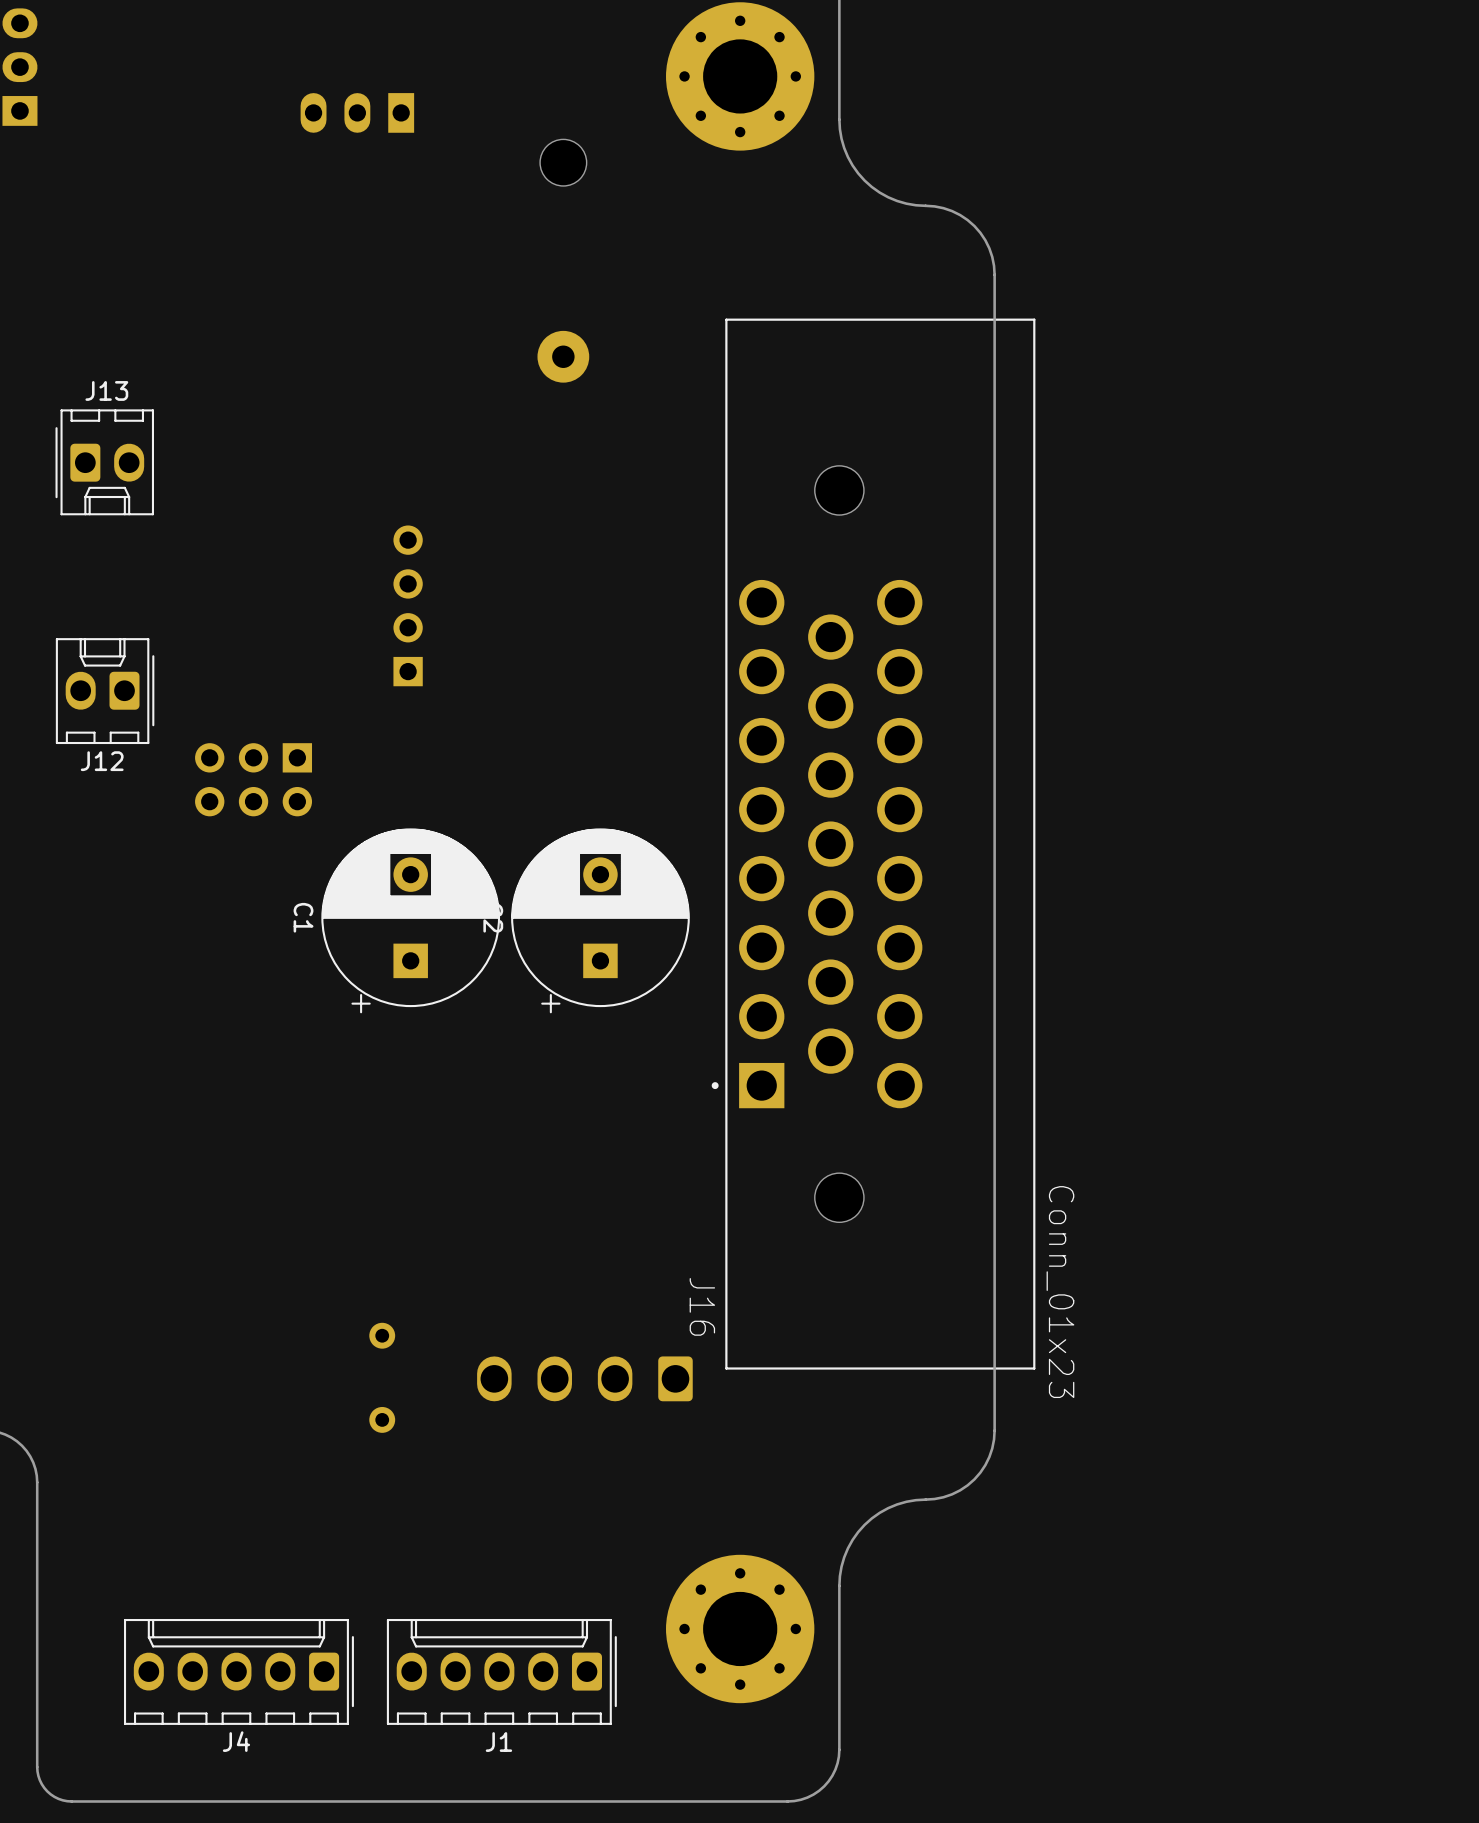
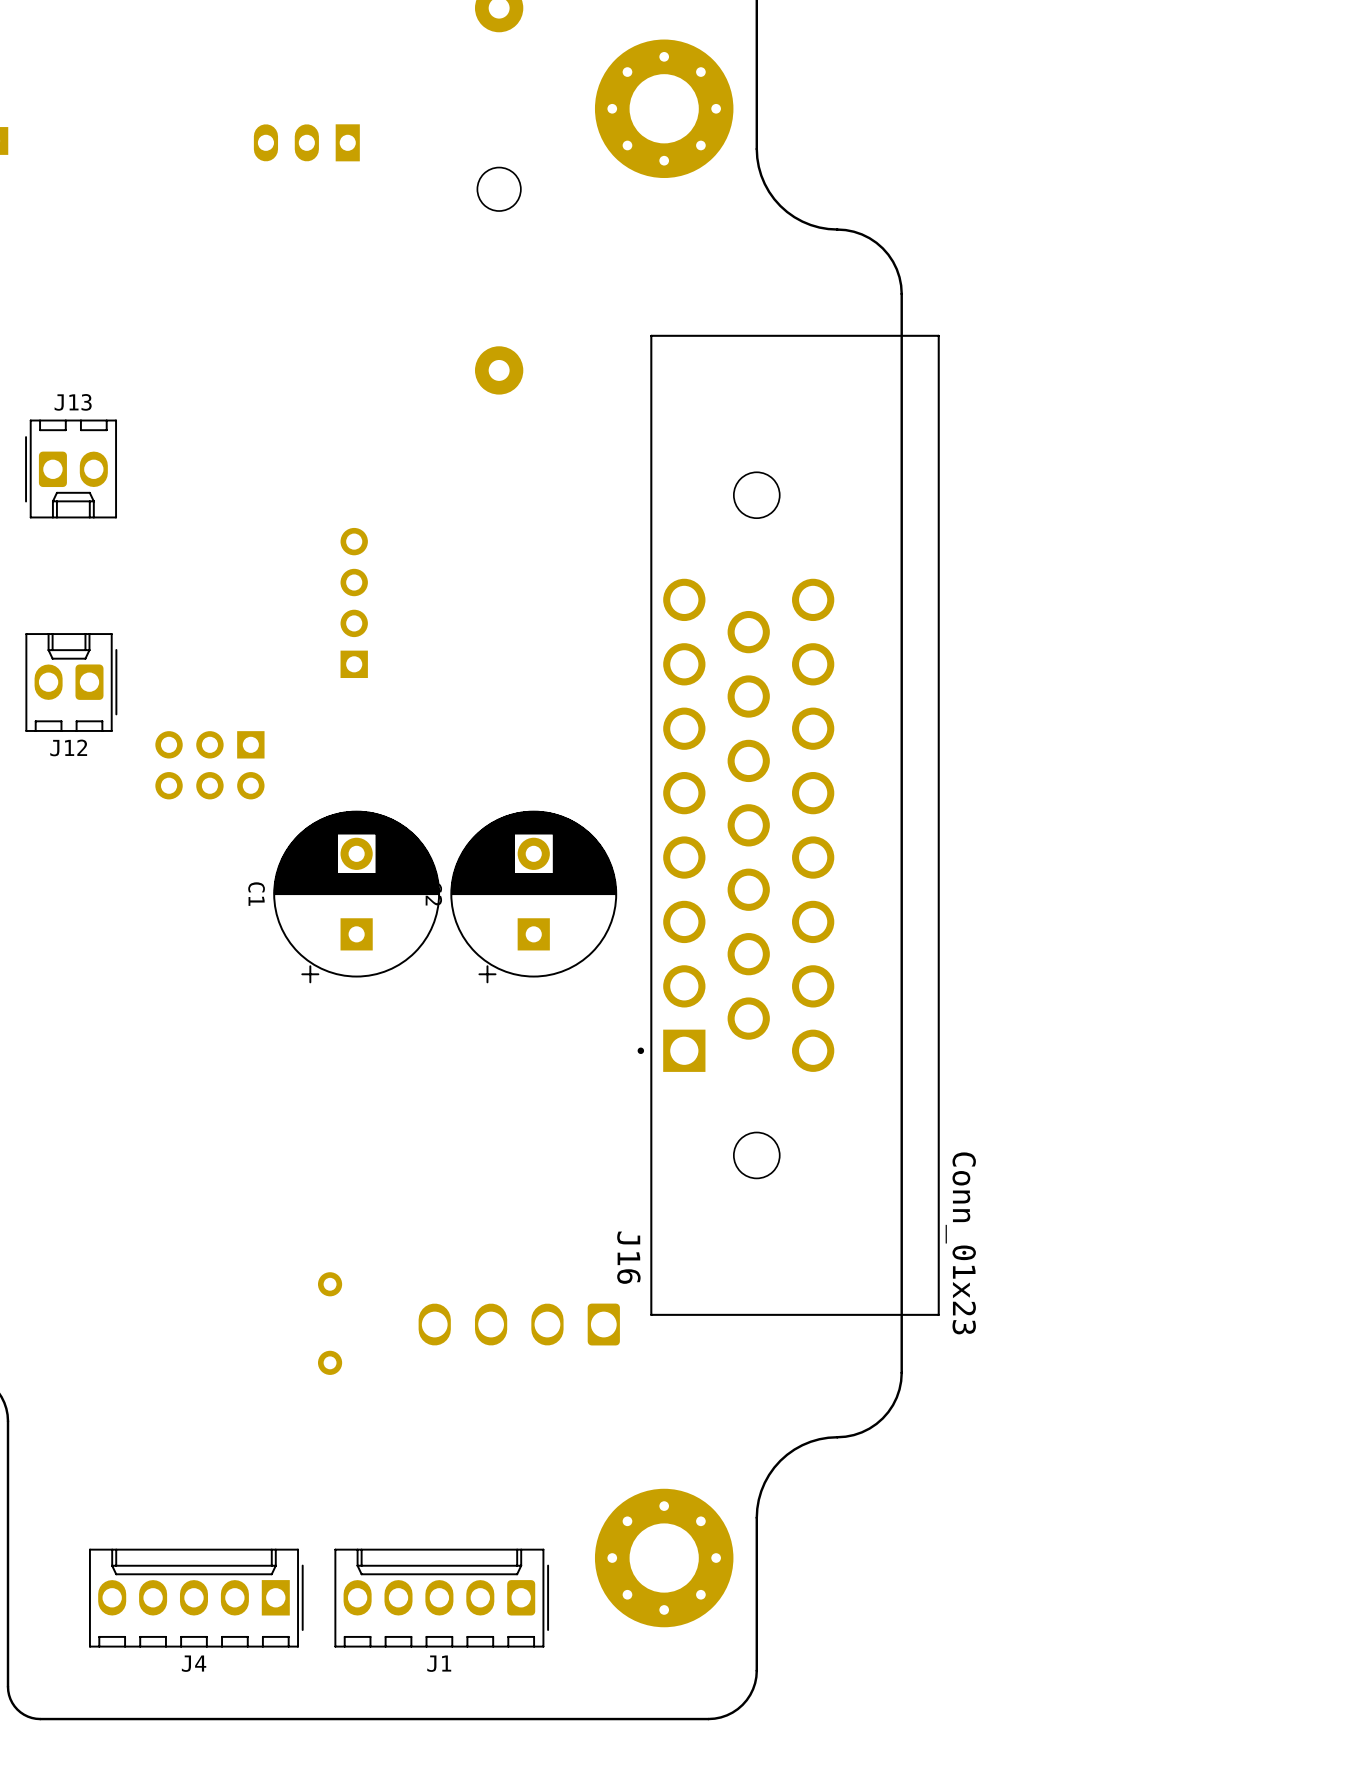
J4 footprint: [123, 1618, 354, 1725] -> [89, 1548, 304, 1648]

